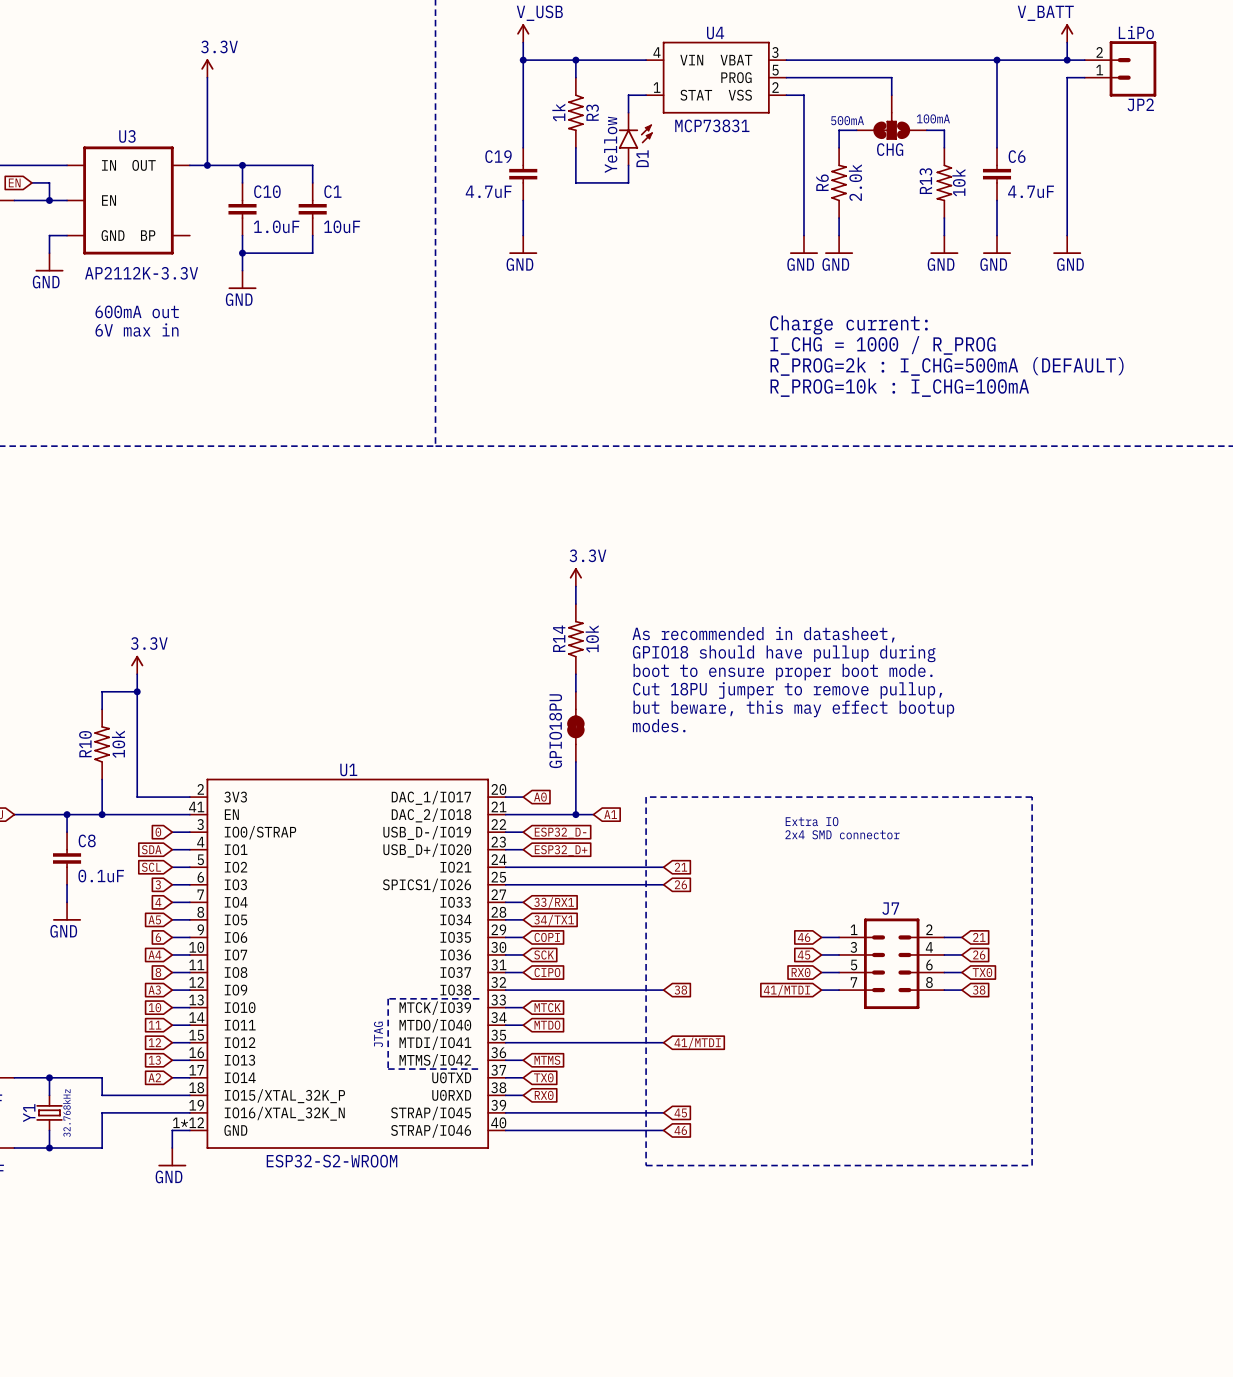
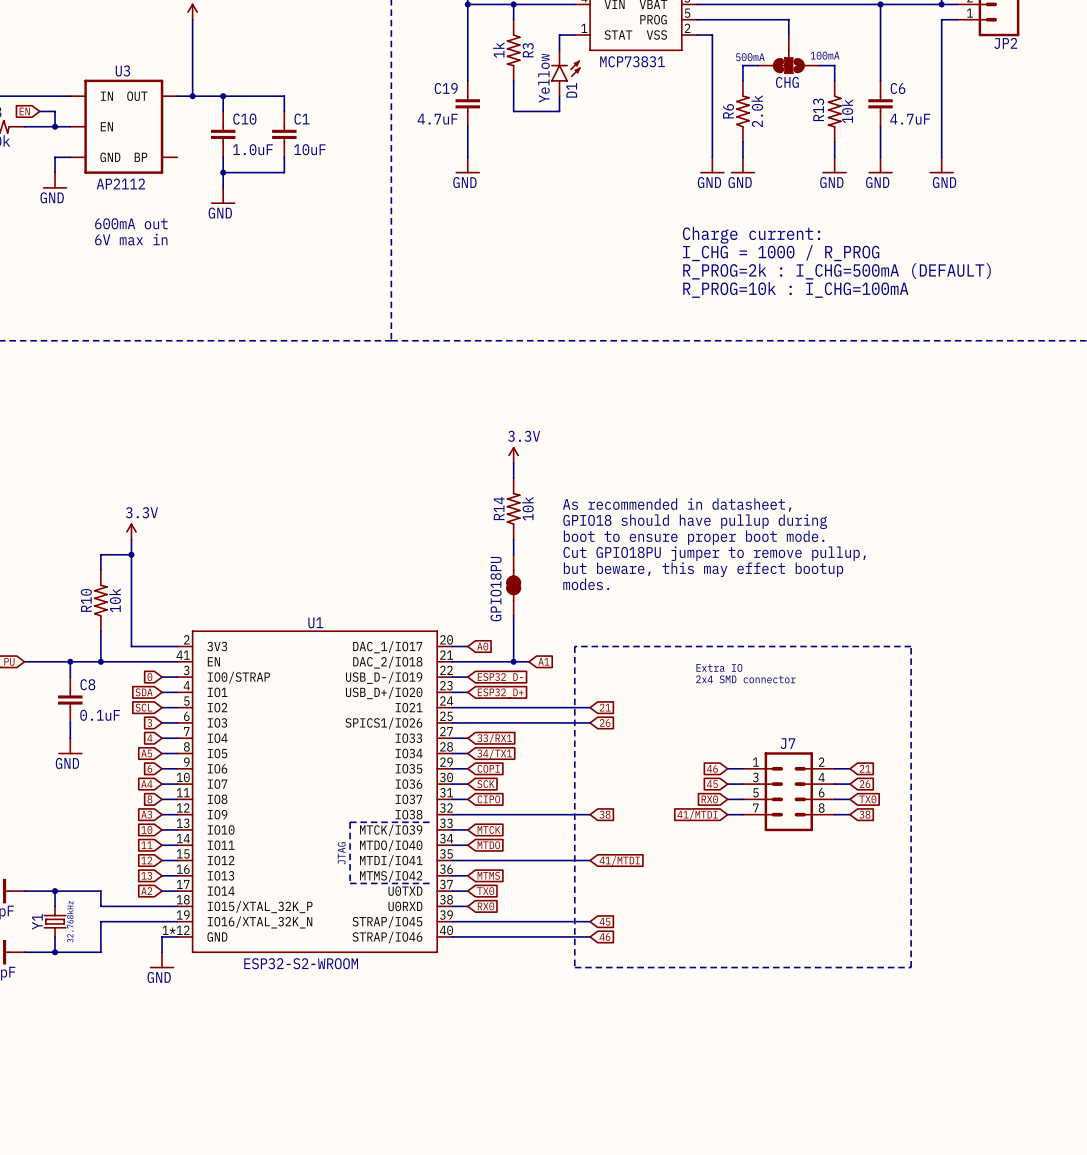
U3 value: AP2112K-3.3V (141, 273) -> AP2112 (120, 183)
text: Cut 18PU jumper to remove pullup, (787, 690) -> Cut GPIO18PU jumper to remove pullup, (714, 553)

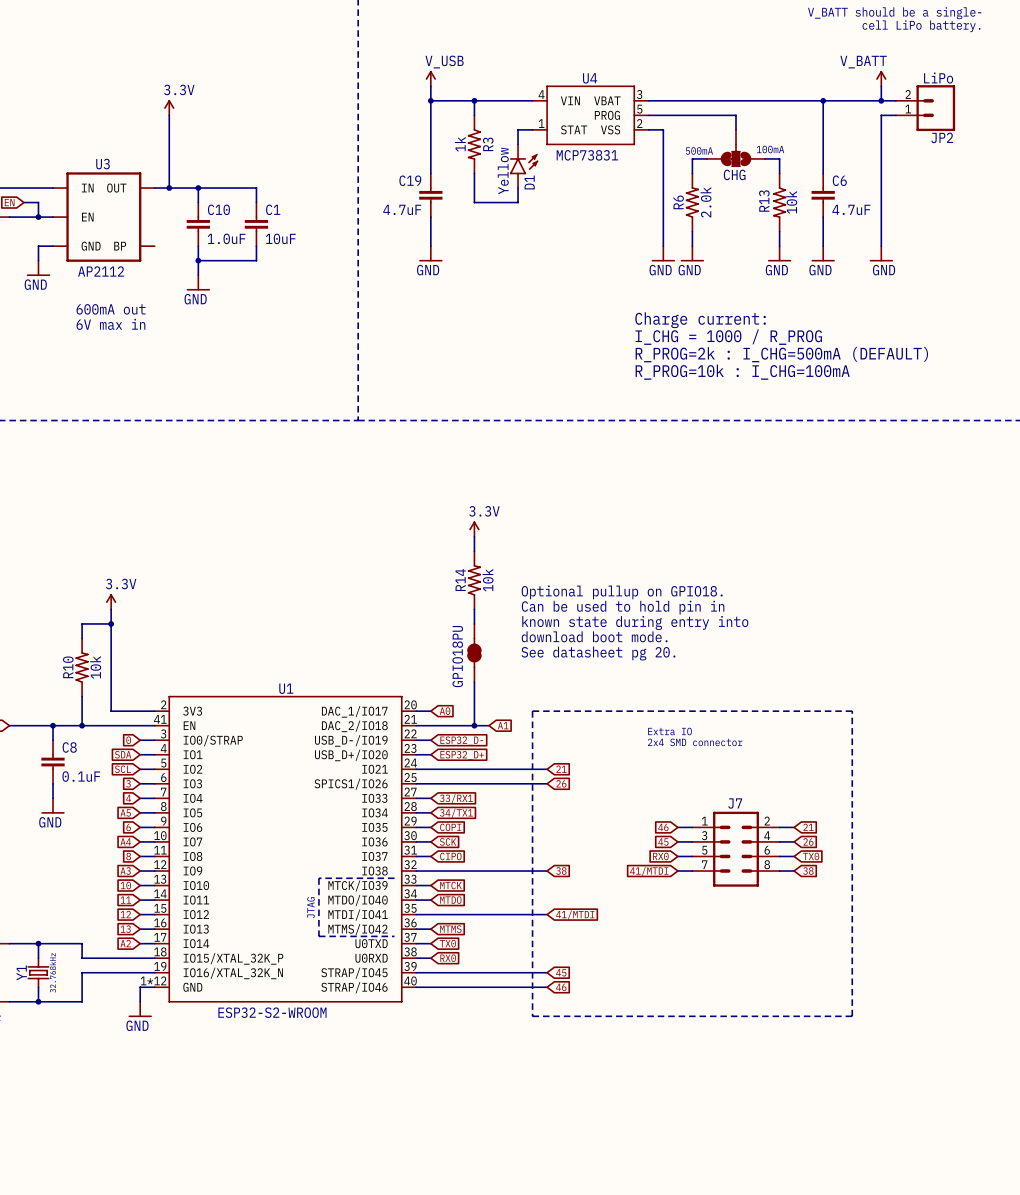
text: As recommended in datasheet, (677, 505) -> none
text: GPIO18 should have pullup during (695, 521) -> Optional pullup on GPIO18. (622, 592)
text: boot to ensure proper boot mode. (694, 537) -> Can be used to hold pin in (623, 607)
text: Cut GPIO18PU jumper to remove pullup, (714, 553) -> known state during entry into (635, 622)
text: but beware, this may effect bootup (703, 569) -> download boot mode. (594, 636)
text: modes. (586, 584) -> See datasheet pg 20. (598, 653)

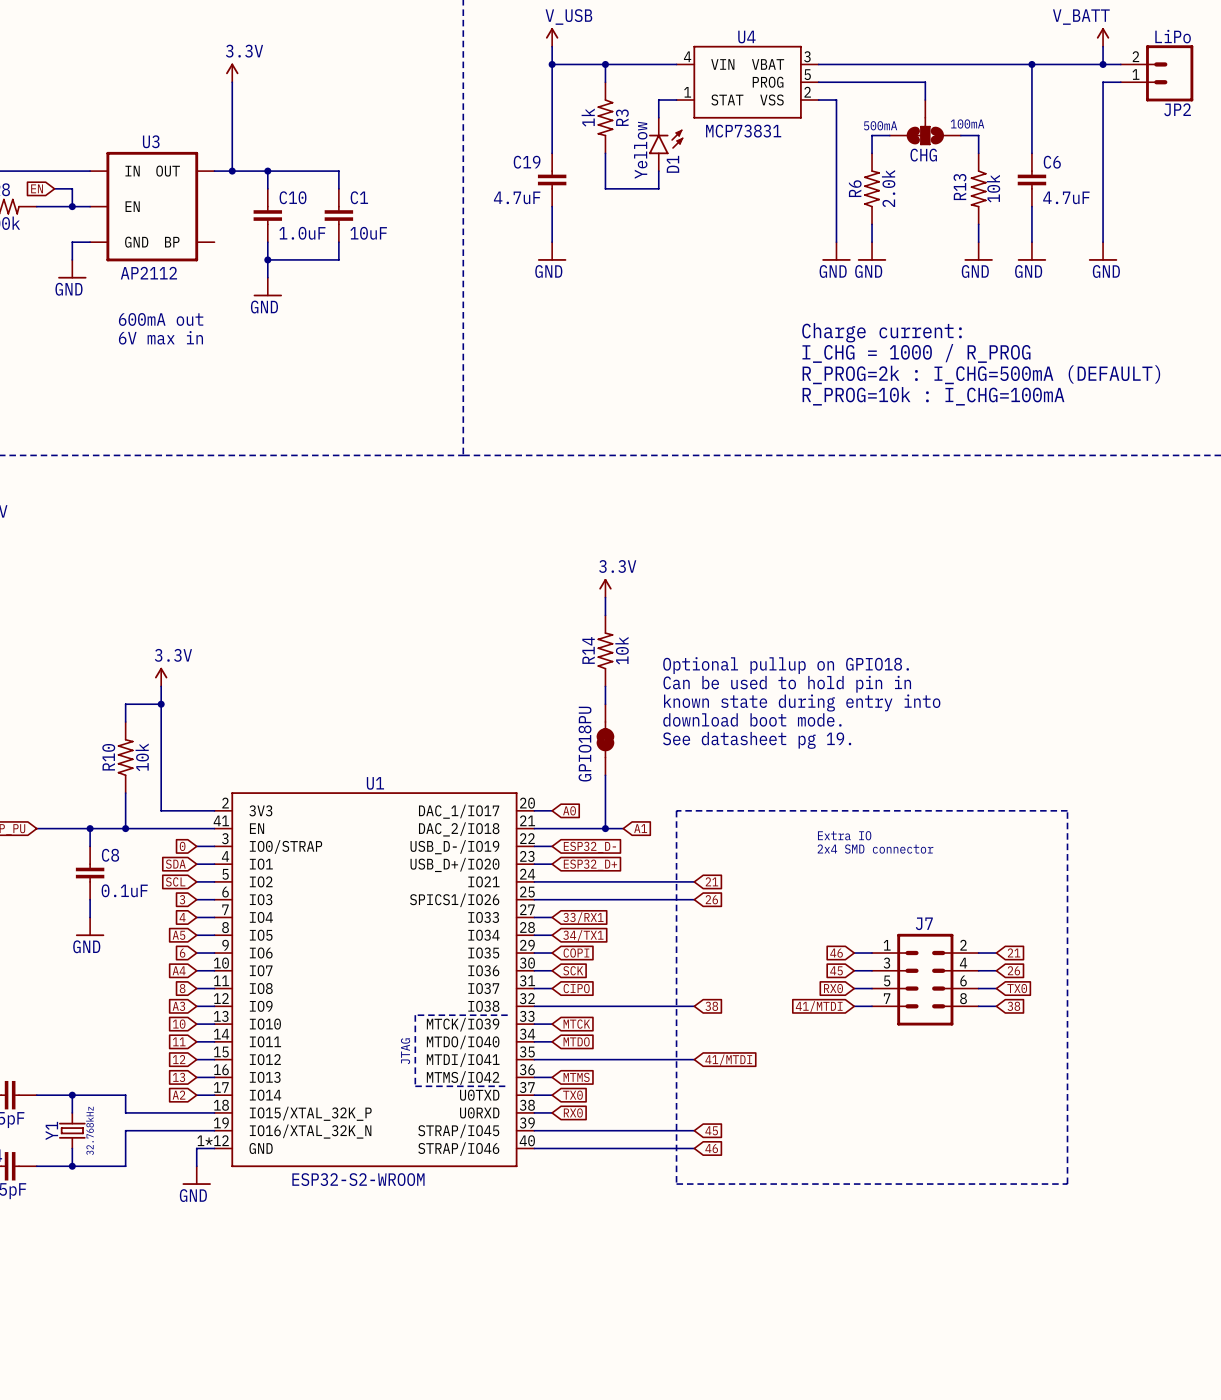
text: See datasheet pg 20. (598, 653) -> See datasheet pg 19. (757, 740)

